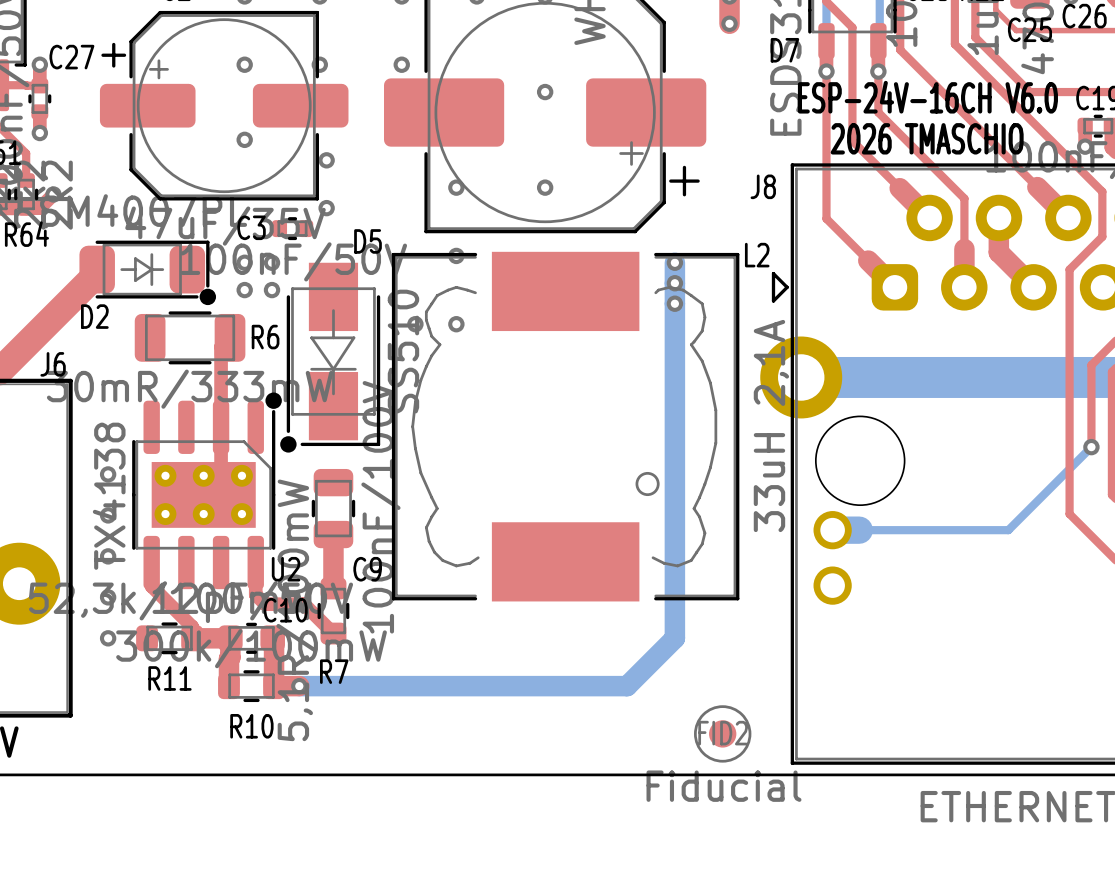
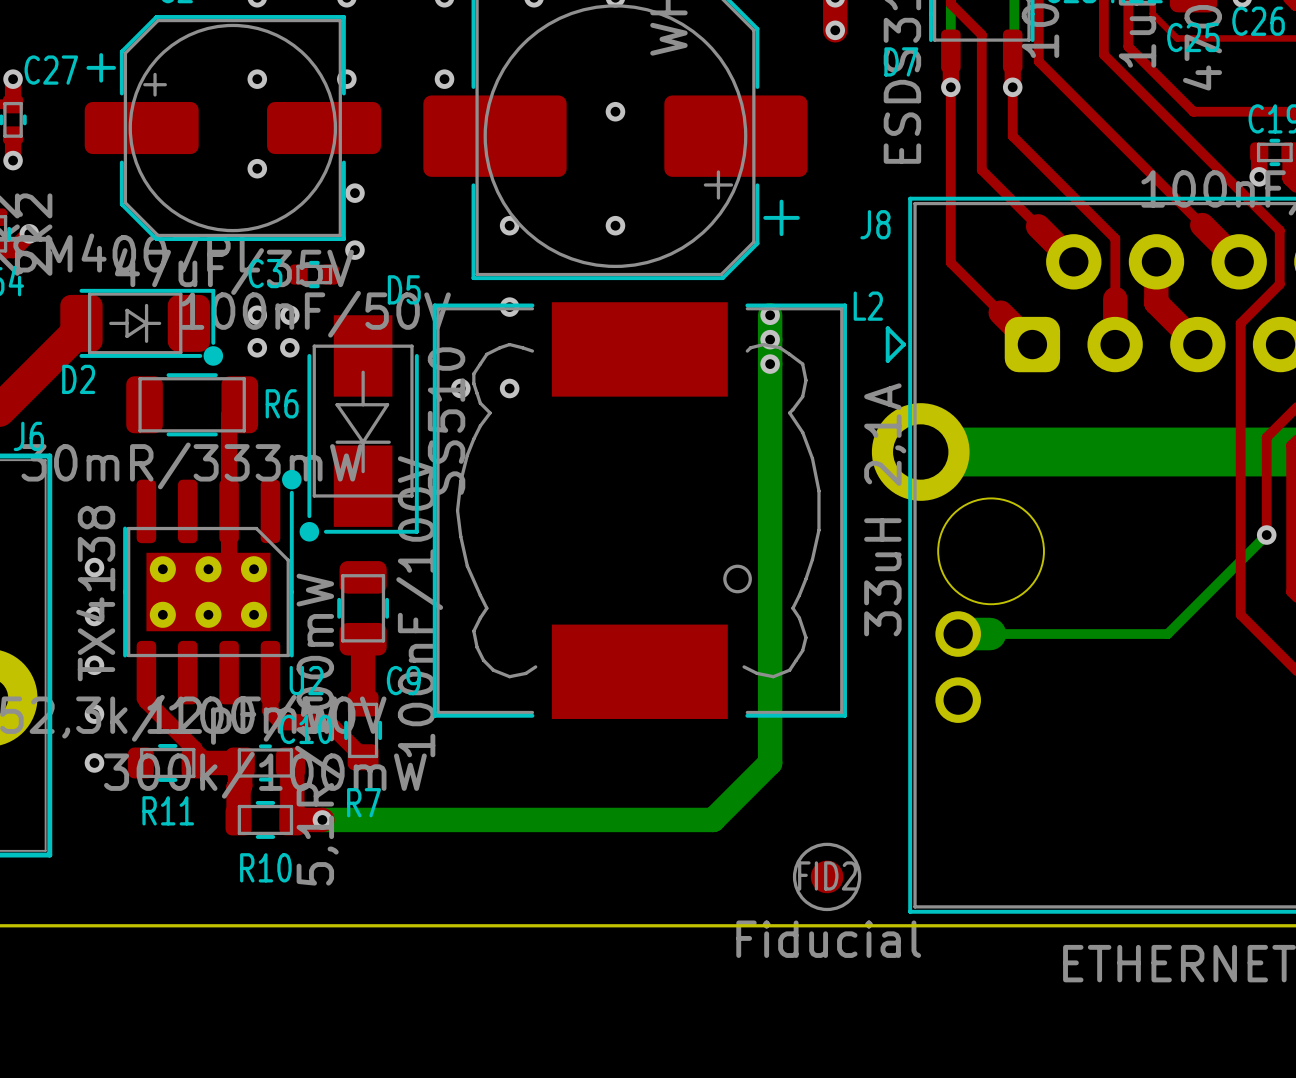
text: ESP-24V-16CH V6.0 (927, 97) -> none
text: 2026 TMASCHIO (927, 138) -> none

